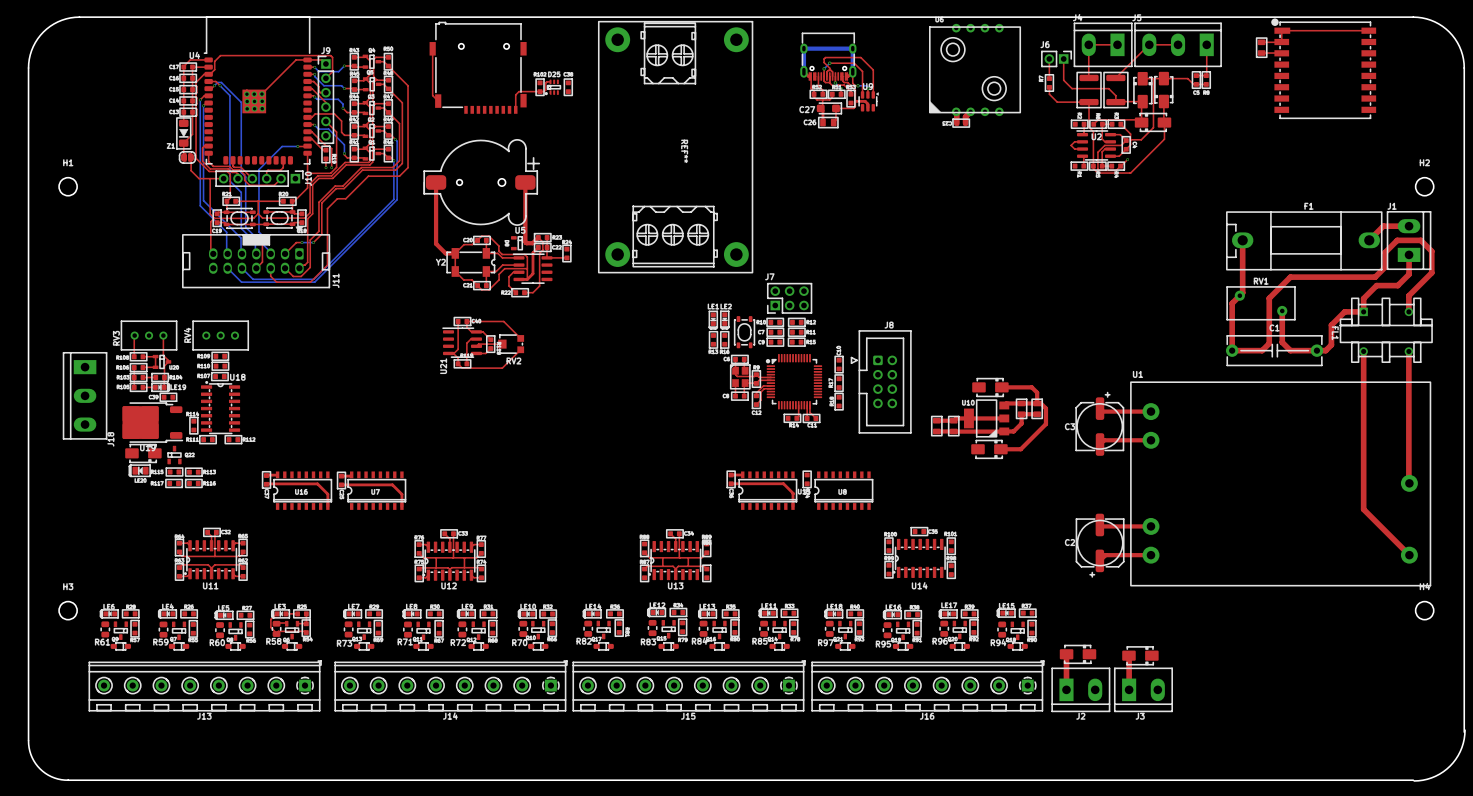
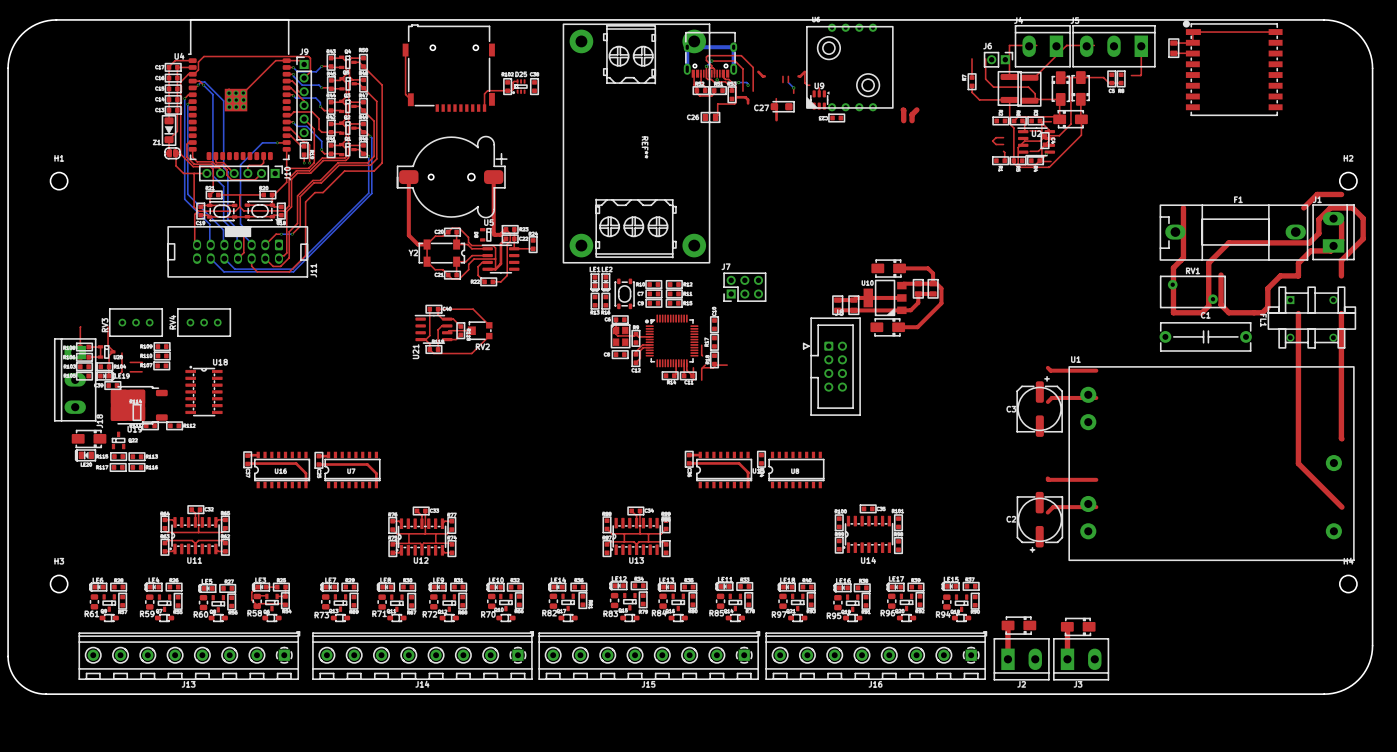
board edge: (79, 17) (62, 20) (46, 29) (33, 46) (28, 63) (28, 740) -> (69, 19) (43, 21) (25, 31) (12, 47) (8, 68) (8, 660) (12, 674) (19, 683) (31, 691) (46, 694) (1324, 694) (1336, 692) (1348, 687) (1358, 679) (1366, 669) (1370, 658) (1372, 645) (1372, 68) (1369, 51) (1358, 34) (1344, 24) (1324, 19)
board edge: (1399, 17) (1422, 17) (1442, 26) (1457, 42) (1464, 63) (1464, 732) -> none
top track: (1368, 30) (1282, 30) (1281, 42) (1261, 42) -> (1275, 32) (1193, 32) (1192, 43) (1173, 43)
top track: (1117, 44) (1088, 44) (1089, 77) -> (1036, 45) (1009, 45) (1009, 76)
top track: (1178, 44) (1148, 44) (1115, 77) -> (1094, 45) (1066, 45) (1035, 76)
part position: (1261, 47) -> (1173, 48)
top track: (1261, 53) (1281, 53) -> (1173, 53) (1192, 53)
part position: (828, 56) -> (710, 55)
top track: (1049, 58) (1049, 78) -> (972, 58) (972, 77)
top track: (1063, 58) (1063, 80) (1072, 88) (1108, 88) (1115, 95) (1115, 102) (1142, 101) (1141, 122) (1138, 119) (1098, 119) (1093, 124) -> (985, 58) (985, 79) (993, 87) (1028, 87) (1035, 93) (1035, 99) (1060, 99) (1059, 119) (1057, 116) (1018, 116) (1014, 120)
via: none -> (711, 61)
top track: (829, 63) (854, 63) (862, 71) (862, 94) -> (711, 61) (735, 61) (742, 68) (742, 91)
bottom track: (829, 63) (824, 68) -> (711, 61) (706, 66)
via: (829, 63) -> none
via: none -> (706, 66)
top track: (824, 68) (825, 82) (829, 82) (833, 86) (844, 85) (850, 94) -> (706, 66) (707, 79) (711, 79) (715, 83) (725, 81) (731, 90)
via: (824, 68) -> none
part position: (1323, 68) -> (1232, 68)
part position: (975, 69) -> (849, 67)
top track: (829, 70) (824, 62) (825, 57) (860, 57) (873, 69) (873, 94) -> (711, 67) (706, 60) (707, 55) (741, 55) (753, 67) (753, 91)
bottom track: (803, 71) (803, 48) (852, 48) (852, 71) -> (687, 69) (687, 47) (733, 47) (733, 69)
top track: (811, 76) (811, 88) (817, 99) (829, 99) (832, 94) -> (694, 73) (694, 84) (699, 95) (711, 95) (714, 90)
top track: (818, 76) (818, 85) (822, 90) (822, 94) -> (701, 73) (701, 82) (705, 86) (705, 90)
top track: (826, 76) (828, 70) (832, 71) (832, 76) -> (709, 73) (710, 67) (714, 69) (714, 73)
top track: (841, 76) (842, 76) (844, 82) (847, 82) (855, 90) (855, 106) (835, 108) (835, 120) (833, 122) -> (722, 73) (725, 79) (728, 79) (736, 86) (736, 102) (717, 104) (717, 115) (715, 117)
top track: (1142, 78) (1187, 78) (1193, 84) (1206, 84) -> (1060, 77) (1103, 77) (1109, 83) (1121, 83)
top track: (1154, 78) (1153, 127) (1141, 139) (1130, 139) -> (1071, 77) (1070, 124) (1059, 135) (1049, 135)
via: none -> (717, 79)
part position: (1196, 80) -> (1111, 78)
part position: (1206, 80) -> (1121, 78)
via: none -> (738, 82)
via: (835, 82) -> none
part position: (1049, 82) -> (972, 81)
via: none -> (748, 85)
bottom track: (858, 85) (866, 85) (867, 88) -> (738, 82) (746, 82) (748, 85)
via: (858, 85) -> none
top track: (1049, 87) (1049, 94) (1057, 102) (1089, 102) (1089, 127) (1093, 131) (1093, 168) (1097, 173) (1130, 173) (1164, 139) (1163, 101) -> (972, 85) (972, 92) (979, 99) (1009, 99) (1009, 123) (1013, 128) (1013, 163) (1018, 167) (1049, 167) (1081, 135) (1080, 99)
via: (867, 88) -> none
part: none -> (1060, 88)
part position: (1115, 90) -> (1009, 88)
part rotation: 0° (1142, 90) -> 180° (1080, 88)
part: (1163, 90) -> none
part position: (818, 94) -> (701, 90)
part position: (836, 94) -> (718, 90)
part position: (850, 98) -> (731, 94)
top track: (856, 101) (865, 101) (867, 107) -> (736, 97) (745, 97) (748, 103)
part position: (828, 122) -> (710, 117)
part position: (1153, 122) -> (1070, 119)
part position: (961, 123) -> (836, 117)
part position: (1079, 124) -> (1000, 120)
part position: (1098, 124) -> (1018, 120)
part position: (1116, 124) -> (1035, 120)
top track: (1120, 124) (1130, 134) (1130, 144) (1119, 156) (1110, 156) -> (1039, 120) (1049, 130) (1049, 140) (1038, 151) (1030, 151)
top track: (1110, 134) (1120, 134) (1126, 140) (1121, 145) (1104, 145) (1097, 152) (1097, 169) (1116, 170) (1127, 159) -> (1030, 130) (1039, 130) (1045, 136) (1040, 141) (1024, 141) (1018, 147) (1018, 163) (1035, 164) (1046, 154)
top track: (1082, 141) (1074, 141) (1071, 145) (1074, 149) (1082, 149) -> (1003, 137) (996, 137) (992, 141) (996, 144) (1003, 144)
part position: (1126, 144) -> (1045, 140)
top track: (1082, 156) (1083, 166) -> (1003, 151) (1004, 160)
via position: (1127, 159) -> (1046, 154)
part position: (1079, 166) -> (1000, 160)
part position: (1097, 166) -> (1018, 160)
part position: (1116, 166) -> (1035, 160)
top track: (1409, 226) (1383, 226) (1369, 240) -> (1341, 194) (1317, 194) (1303, 207)
top track: (1242, 240) (1242, 292) (1232, 303) (1232, 350) (1262, 350) (1269, 343) (1269, 298) (1290, 277) (1375, 277) (1385, 267) (1385, 252) (1397, 240) (1420, 240) (1431, 251) (1431, 272) (1408, 295) (1408, 311) -> (1183, 207) (1183, 257) (1173, 267) (1173, 312) (1201, 312) (1208, 306) (1208, 263) (1228, 242) (1309, 242) (1318, 233) (1318, 219) (1330, 207) (1352, 207) (1363, 218) (1363, 238) (1341, 260) (1341, 275)
top track: (1409, 254) (1409, 274) (1397, 285) (1376, 285) (1363, 298) (1363, 311) (1344, 311) (1331, 325) (1331, 344) (1325, 350) (1290, 350) (1282, 342) (1282, 310) -> (1341, 221) (1341, 240) (1330, 250) (1310, 250) (1298, 263) (1298, 275) (1280, 275) (1267, 288) (1267, 307) (1262, 312) (1228, 312) (1221, 304) (1221, 275)
part: none -> (888, 268)
part: none -> (918, 288)
part: none -> (933, 288)
part: none -> (837, 305)
part: none -> (853, 305)
part position: (713, 320) -> (594, 282)
part position: (724, 320) -> (605, 282)
part position: (775, 322) -> (653, 284)
part position: (796, 322) -> (674, 284)
part position: (744, 332) -> (624, 293)
part position: (775, 332) -> (653, 293)
part position: (796, 332) -> (674, 293)
top track: (134, 335) (134, 356) -> (80, 326) (80, 347)
top track: (163, 335) (163, 355) (168, 360) (164, 365) (164, 387) -> (108, 326) (108, 345) (112, 350) (109, 355) (108, 376)
part position: (713, 339) -> (595, 301)
part position: (724, 339) -> (605, 301)
part: none -> (887, 327)
part position: (775, 342) -> (653, 303)
part position: (796, 342) -> (674, 303)
top track: (1363, 351) (1363, 509) (1409, 555) -> (1298, 313) (1298, 463) (1341, 507)
top track: (1408, 351) (1409, 483) -> (1341, 313) (1341, 438)
part position: (138, 356) -> (84, 347)
top track: (142, 356) (155, 356) (155, 367) (142, 367) -> (88, 347) (100, 346) (100, 357) (88, 357)
part position: (220, 356) -> (162, 346)
top track: (735, 359) (735, 374) (737, 376) (754, 376) (756, 374) (759, 377) (770, 377) -> (616, 319) (616, 334) (617, 335) (634, 335) (635, 334) (638, 336) (649, 336)
part position: (739, 359) -> (620, 319)
part position: (162, 361) -> (106, 351)
part position: (839, 364) -> (714, 324)
part position: (220, 366) -> (162, 355)
part position: (138, 367) -> (84, 357)
part position: (219, 376) -> (161, 365)
part position: (740, 376) -> (620, 336)
part position: (138, 377) -> (84, 366)
part position: (160, 377) -> (104, 366)
part position: (756, 379) -> (635, 338)
part position: (793, 381) -> (671, 340)
part position: (839, 383) -> (714, 342)
top track: (771, 385) (763, 385) (756, 393) (756, 395) -> (649, 344) (642, 344) (635, 351) (635, 354)
part position: (138, 387) -> (84, 376)
part position: (160, 387) -> (105, 376)
part: (990, 387) -> none
top track: (1001, 387) (1031, 387) (1037, 392) (1037, 403) -> (899, 268) (928, 268) (933, 273) (933, 283)
top track: (771, 388) (764, 388) (761, 391) (761, 399) (756, 404) -> (649, 347) (643, 347) (640, 350) (640, 358) (635, 362)
part position: (739, 396) -> (620, 354)
part position: (168, 397) -> (112, 385)
part position: (756, 400) -> (635, 358)
part position: (839, 401) -> (714, 359)
top track: (798, 405) (798, 416) (796, 418) -> (676, 363) (674, 375)
top track: (807, 405) (807, 418) -> (684, 363) (684, 375)
top track: (809, 405) (809, 412) (815, 418) -> (686, 363) (686, 370) (692, 375)
top track: (1004, 405) (1006, 403) (1040, 403) (1045, 408) (1045, 424) (1020, 449) (1000, 449) -> (901, 285) (903, 283) (936, 283) (941, 288) (941, 303) (917, 327) (898, 327)
part: (1021, 408) -> none
part: (1037, 408) -> none
top track: (1100, 408) (1102, 411) (1150, 411) -> (1047, 367) (1050, 370) (1096, 370)
top track: (1037, 414) (1021, 414) (1021, 423) (1013, 431) (936, 431) -> (933, 293) (918, 293) (918, 302) (910, 310) (837, 310)
part position: (792, 418) -> (670, 375)
part position: (811, 418) -> (688, 375)
part position: (986, 418) -> (885, 297)
top track: (1004, 418) (956, 418) (953, 420) (936, 420) -> (901, 297) (855, 297) (853, 300) (837, 300)
part position: (193, 425) -> (137, 412)
part: (936, 426) -> none
part: (953, 426) -> none
part position: (208, 439) -> (150, 425)
part position: (233, 439) -> (174, 425)
top track: (1150, 440) (1104, 440) (1100, 444) -> (1096, 397) (1051, 397) (1047, 401)
part: (989, 449) -> none
part position: (143, 453) -> (89, 438)
part position: (174, 455) -> (118, 440)
part position: (139, 470) -> (85, 455)
part position: (174, 472) -> (118, 456)
part position: (193, 472) -> (137, 456)
part position: (174, 483) -> (118, 467)
part position: (193, 483) -> (137, 467)
top track: (1099, 524) (1150, 526) -> (1047, 478) (1096, 479)
top track: (1150, 555) (1105, 555) (1099, 560) -> (1096, 507) (1053, 507) (1047, 512)
board edge: (1465, 730) (1460, 751) (1450, 766) (1435, 776) (1414, 780) -> none
board edge: (28, 740) (30, 754) (40, 768) (54, 778) (68, 780) -> none
board edge: (68, 780) (1413, 780) -> none

